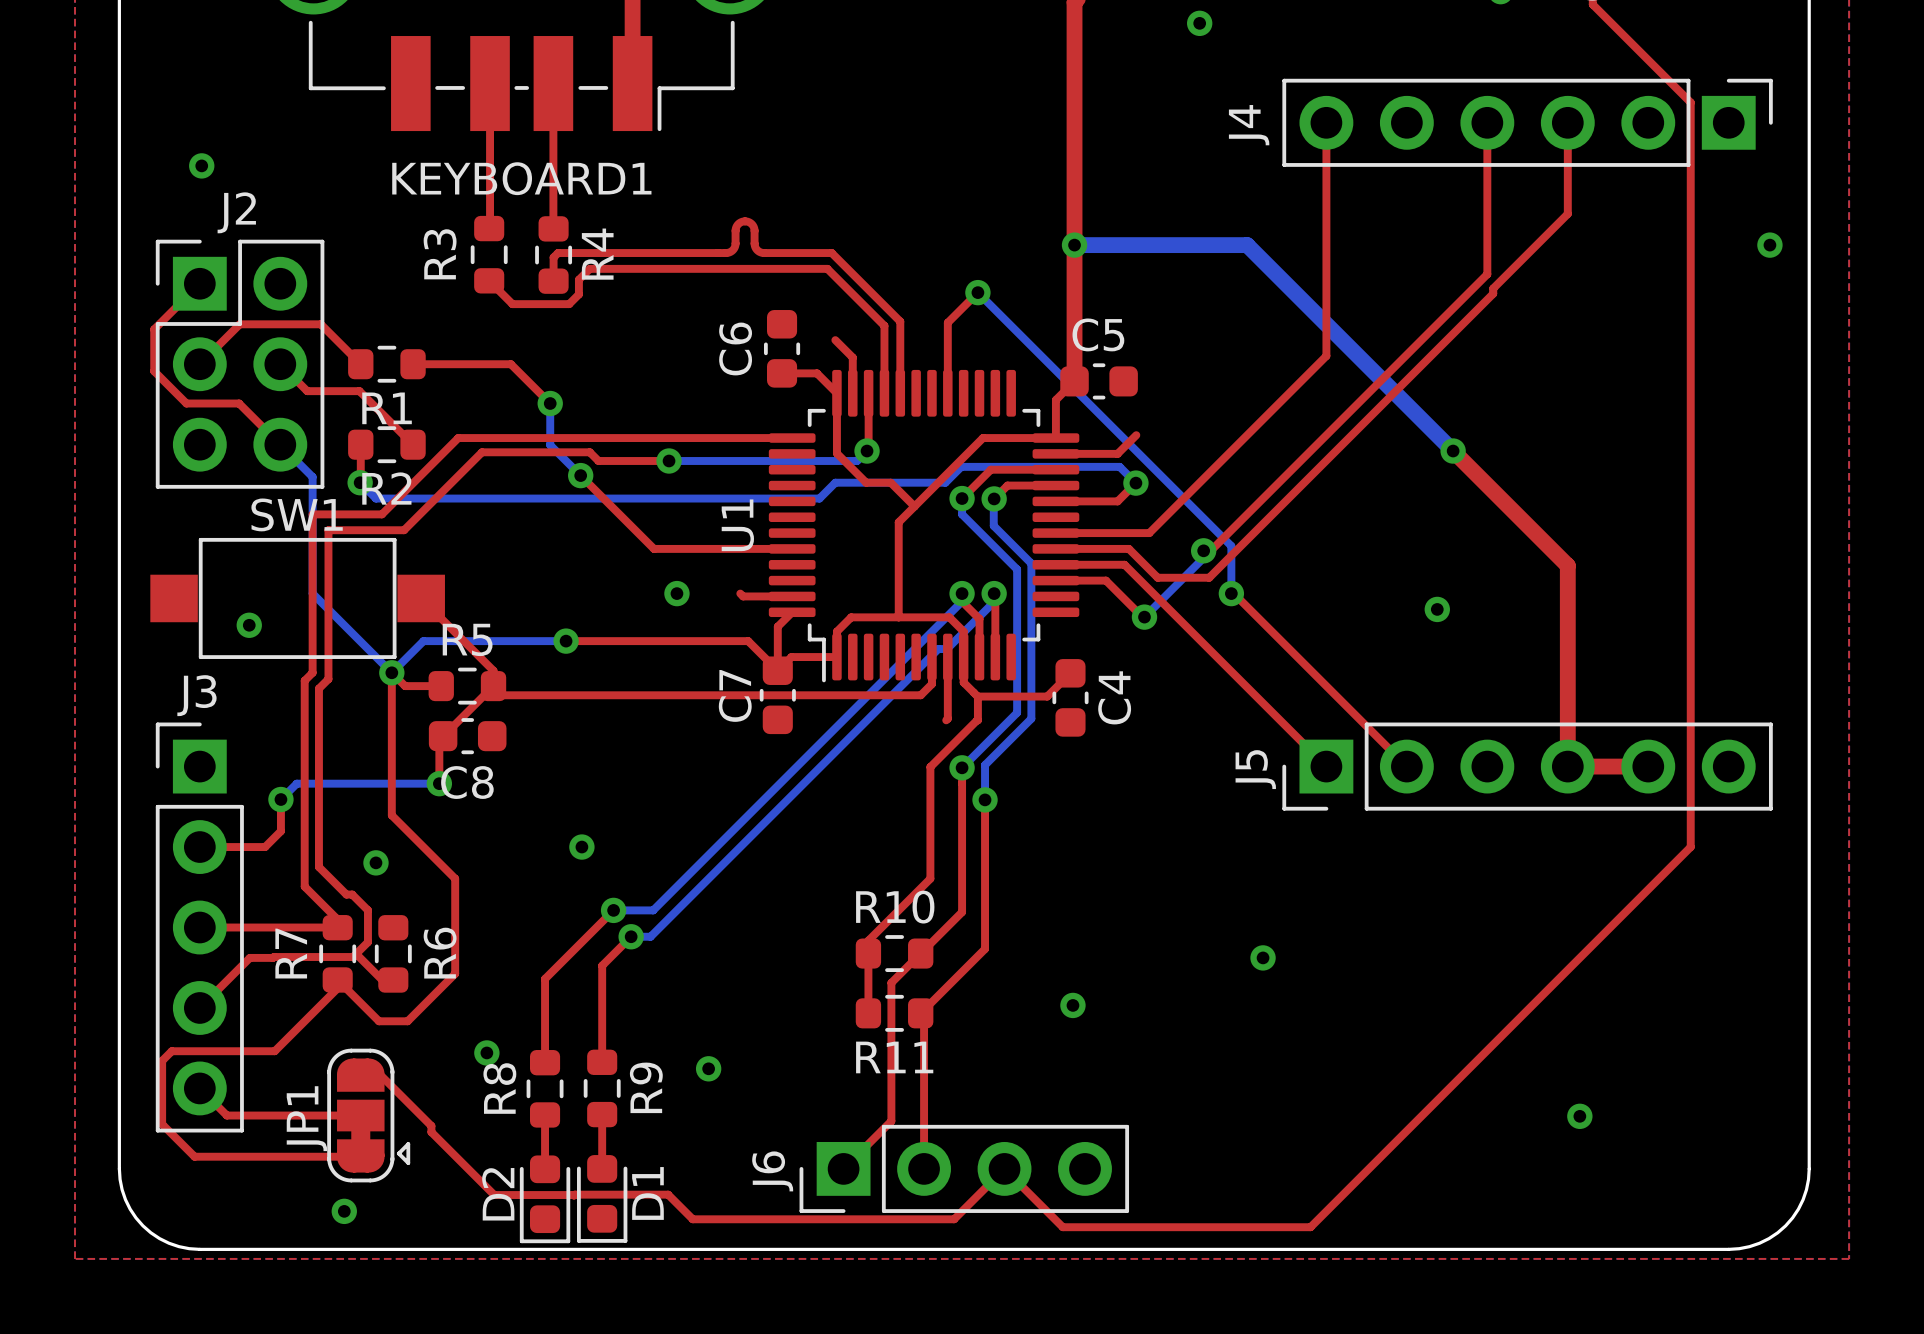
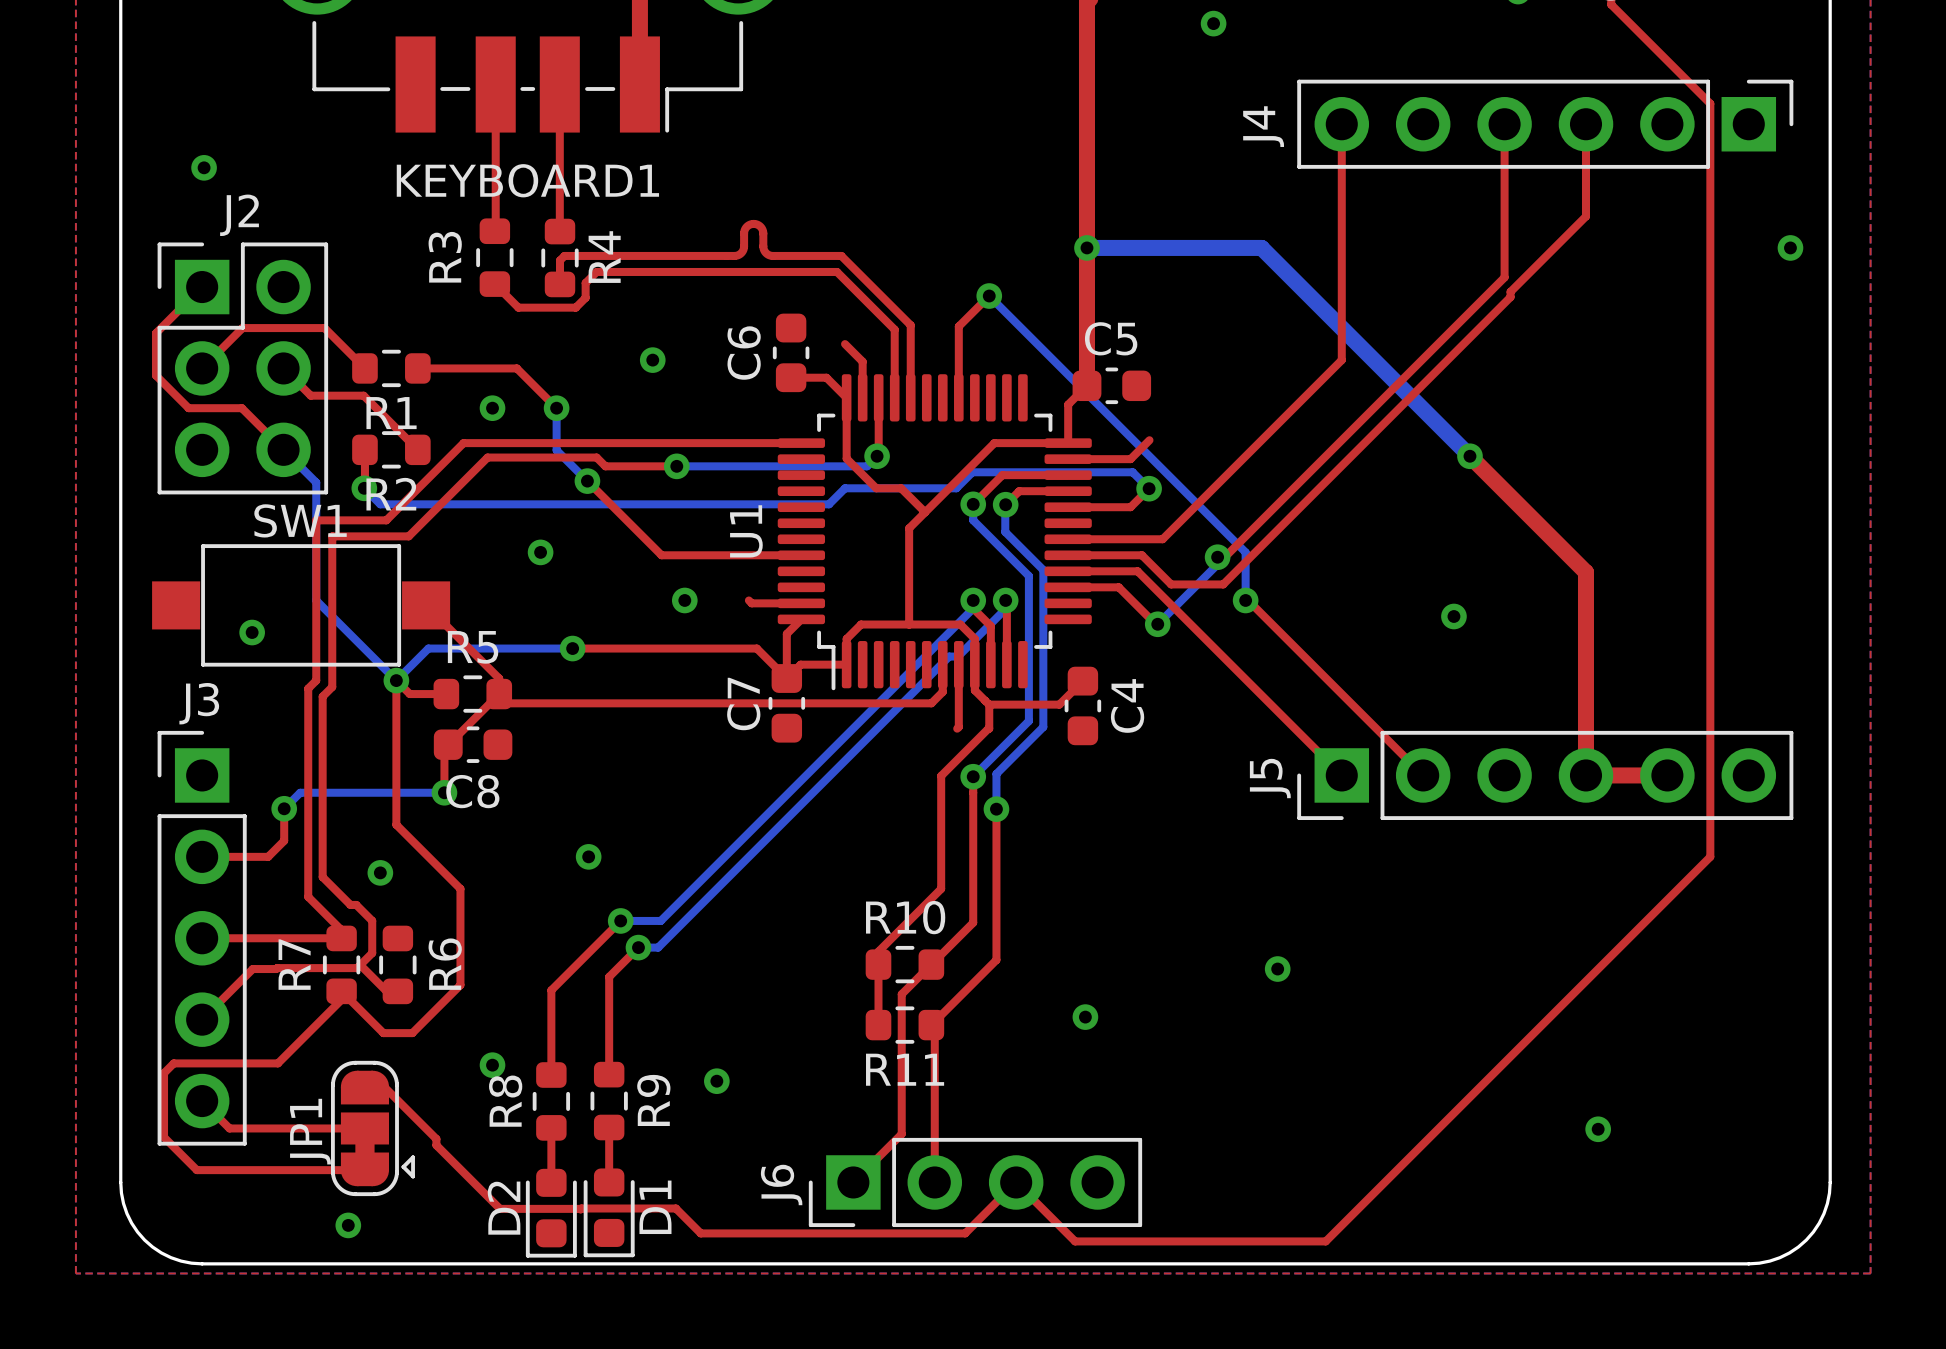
via: none -> (652, 360)
via: none -> (492, 408)
via: none -> (540, 552)

